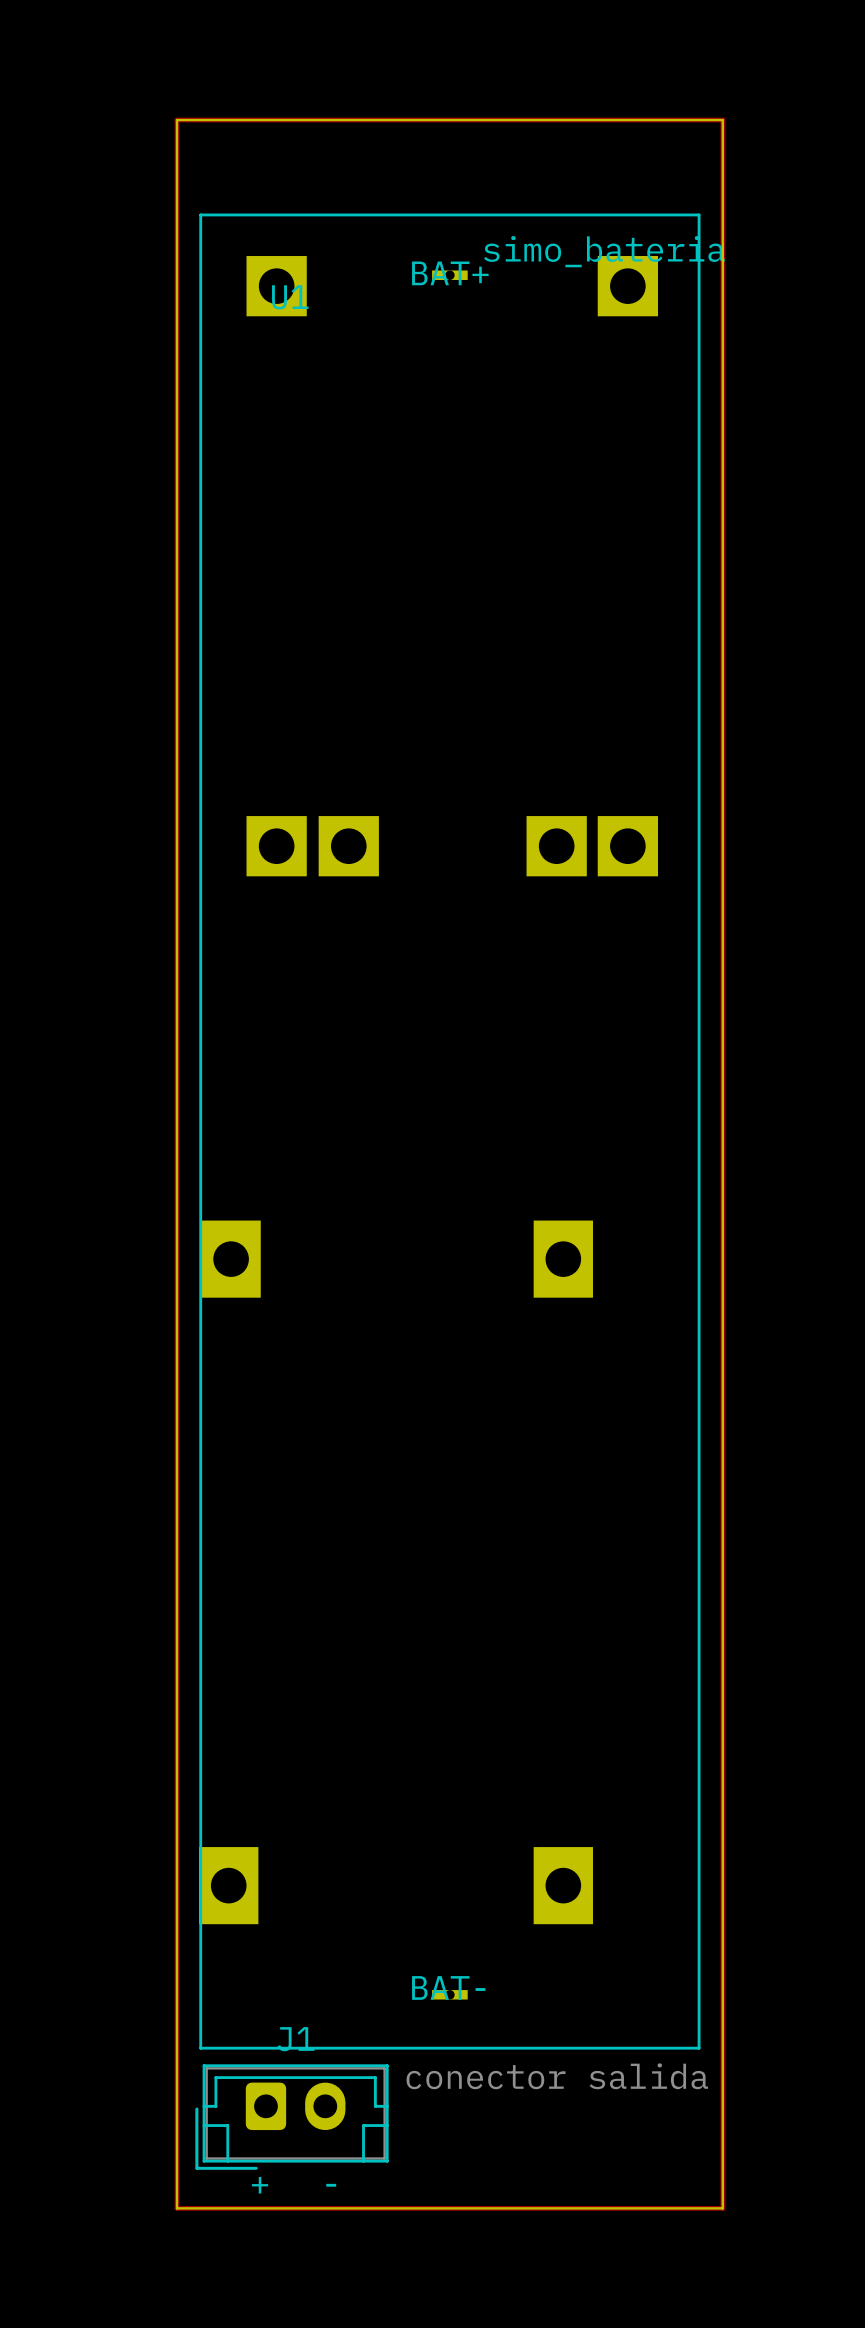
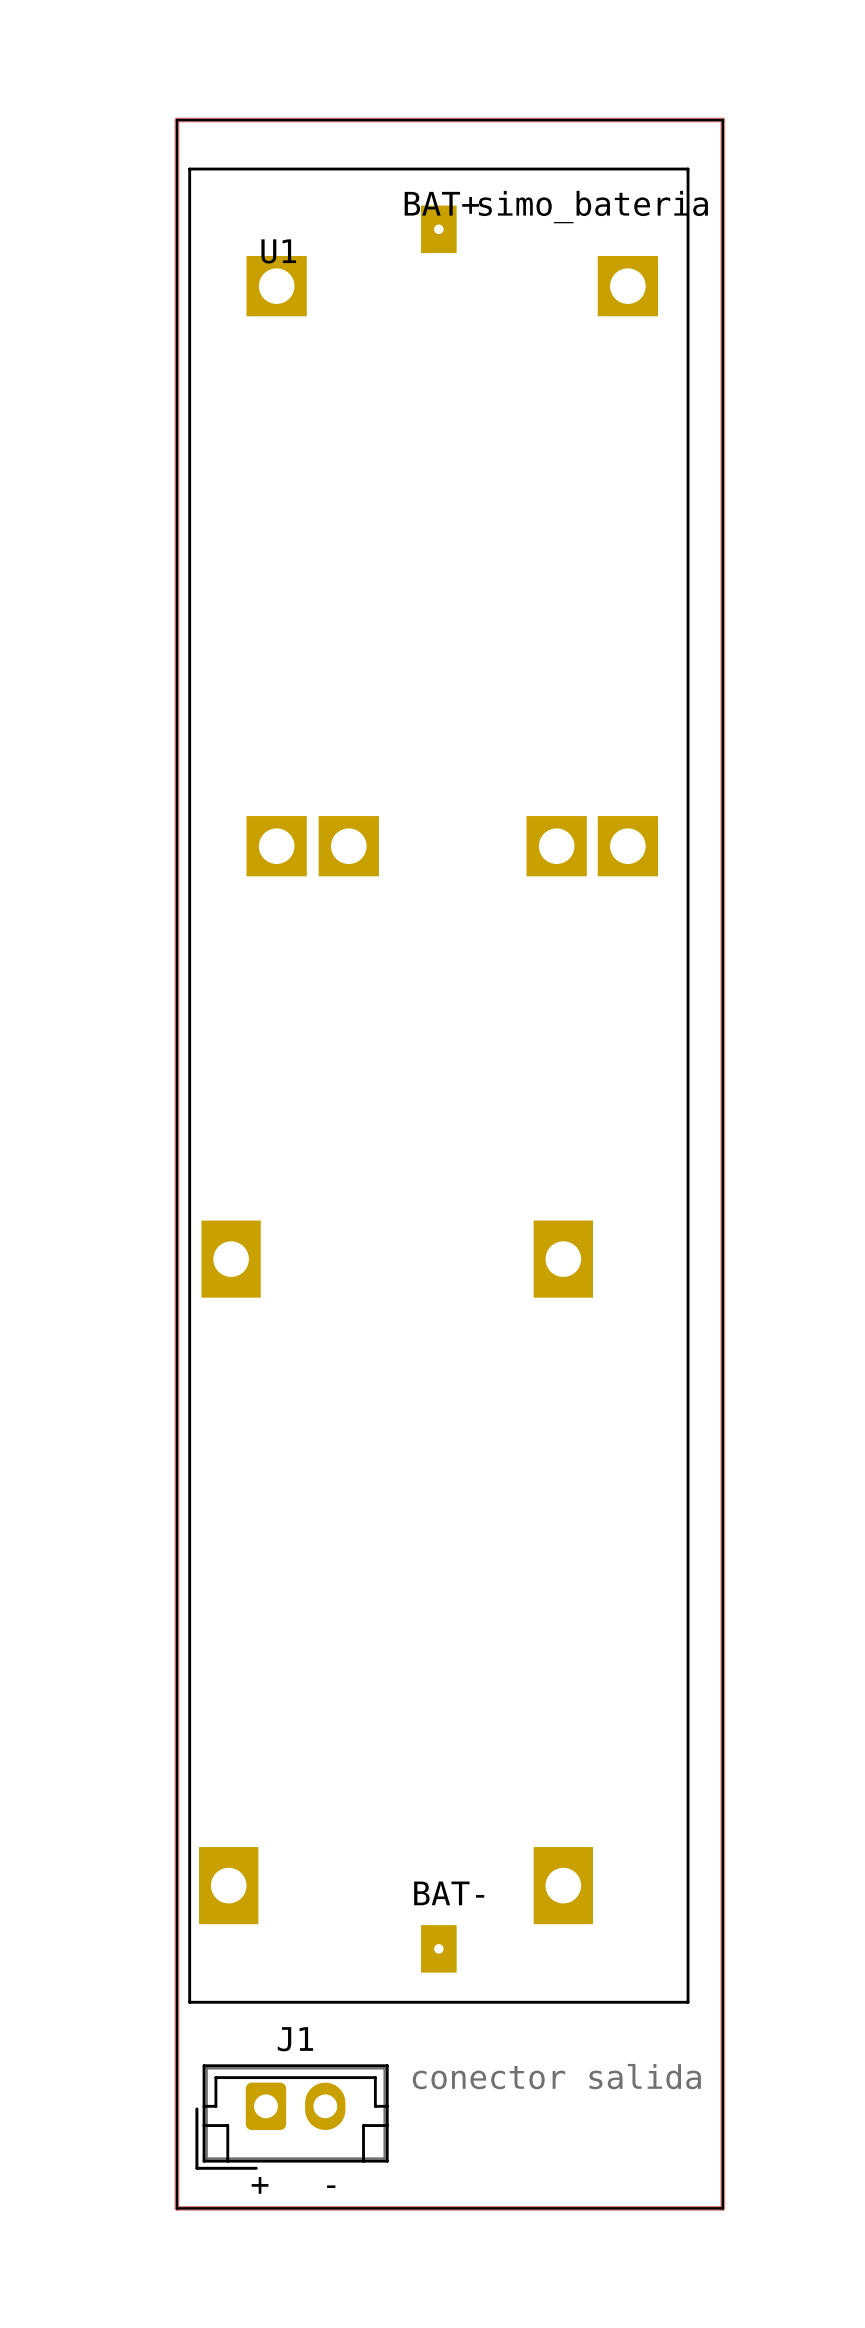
U1 footprint: [199, 213, 701, 2050] -> [188, 167, 690, 2004]

